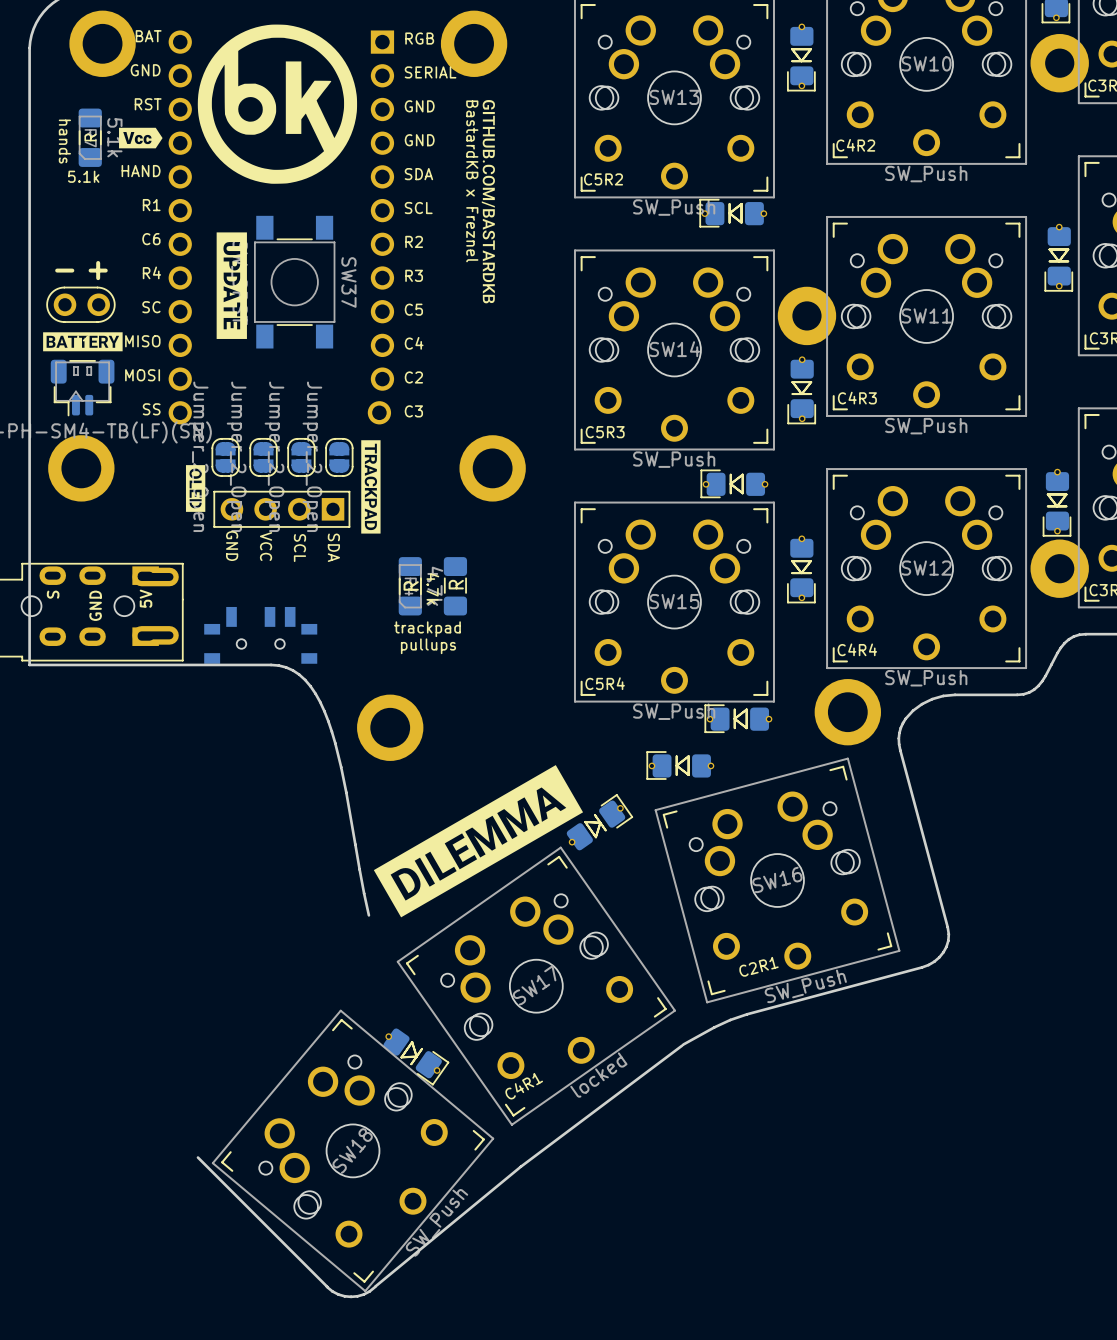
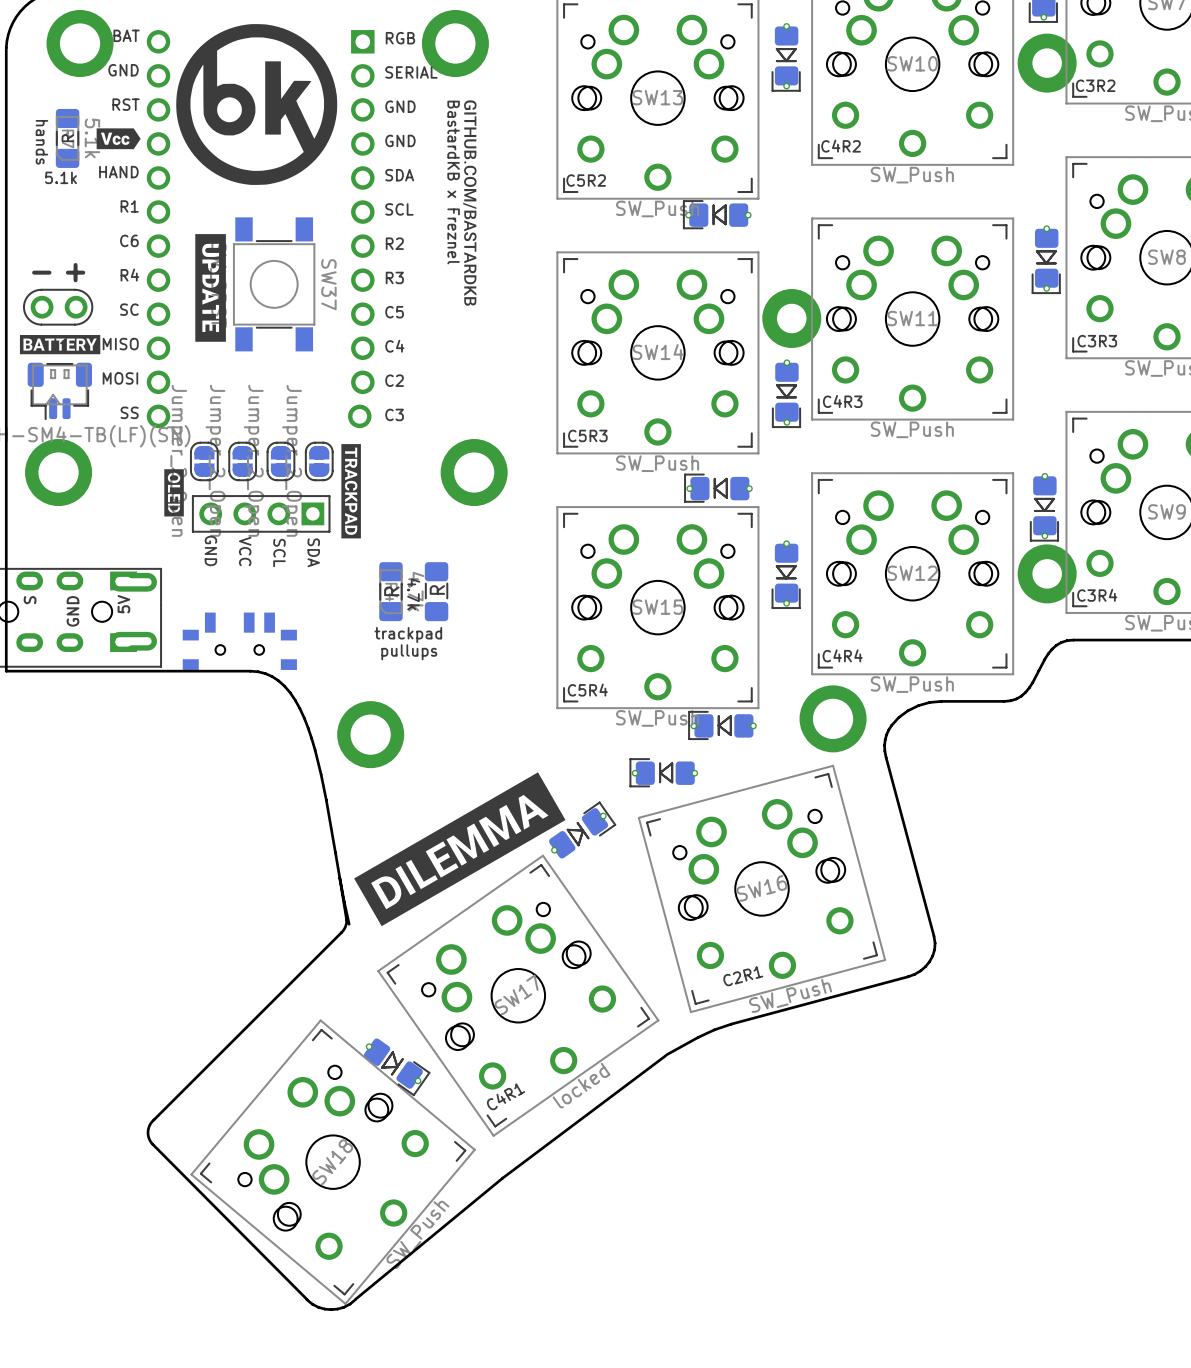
board edge: (197, 1157) (327, 1287) -> (339, 877) (346, 920) (342, 931) (152, 1121) (148, 1132) (152, 1144) (307, 1299)

